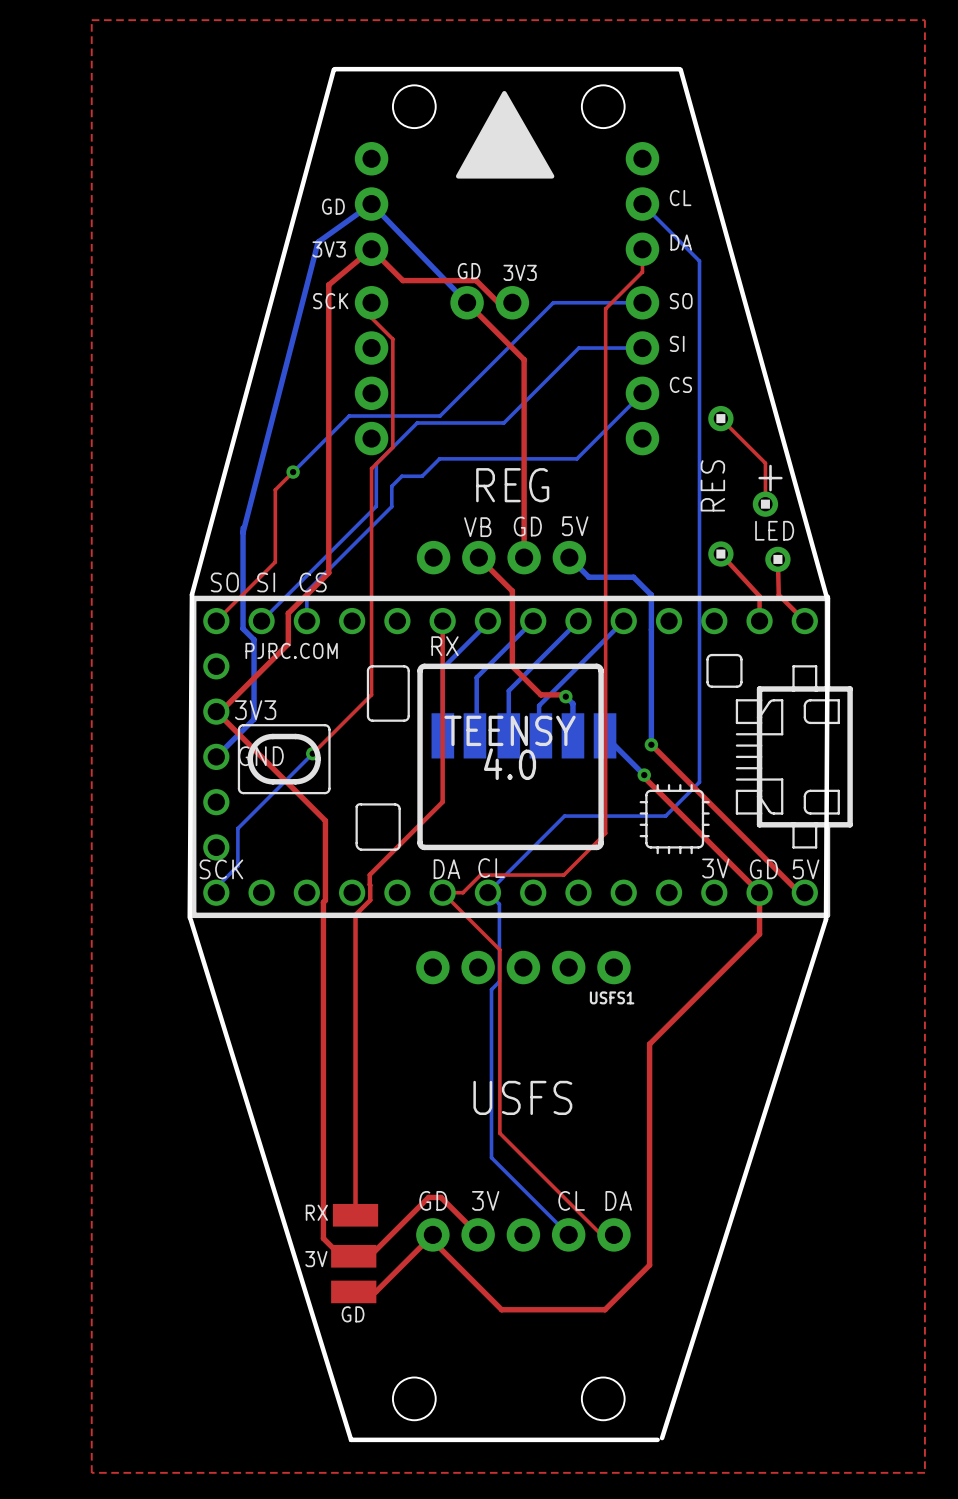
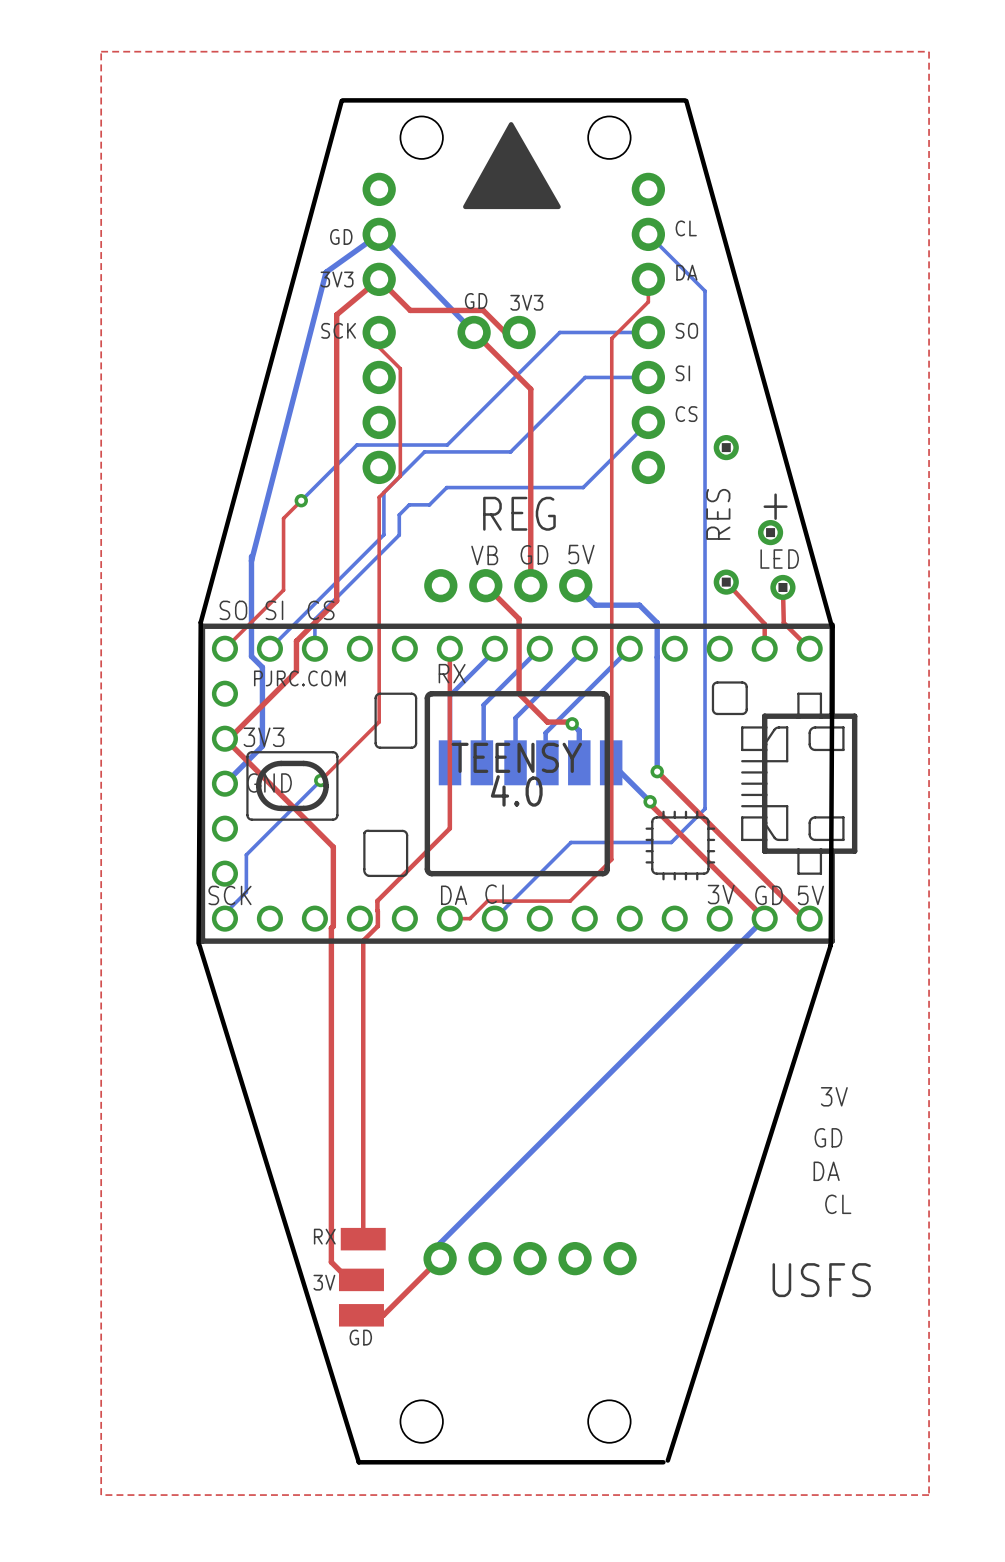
top track: (720, 418) (765, 463) (765, 504) -> none
top track: (442, 892) (499, 949) (499, 1133) (601, 1234) (613, 1234) -> none
bottom track: (487, 892) (499, 904) (499, 981) (491, 989) (491, 1157) (568, 1234) -> none
top track: (759, 892) (759, 934) (649, 1044) (649, 1265) (605, 1309) (501, 1309) (432, 1240) (432, 1235) -> none
bottom track: none -> (764, 918) (440, 1243) (440, 1258)
USFS1: (523, 967) -> none
text position: USFS (522, 1097) -> USFS (821, 1280)
text position: GD (433, 1200) -> GD (828, 1137)
text position: 3V (485, 1200) -> 3V (834, 1096)
text position: CL (571, 1200) -> CL (838, 1204)
text position: DA (618, 1200) -> DA (826, 1171)
top track: (478, 1234) (441, 1197) (428, 1197) (369, 1256) (353, 1256) -> none

